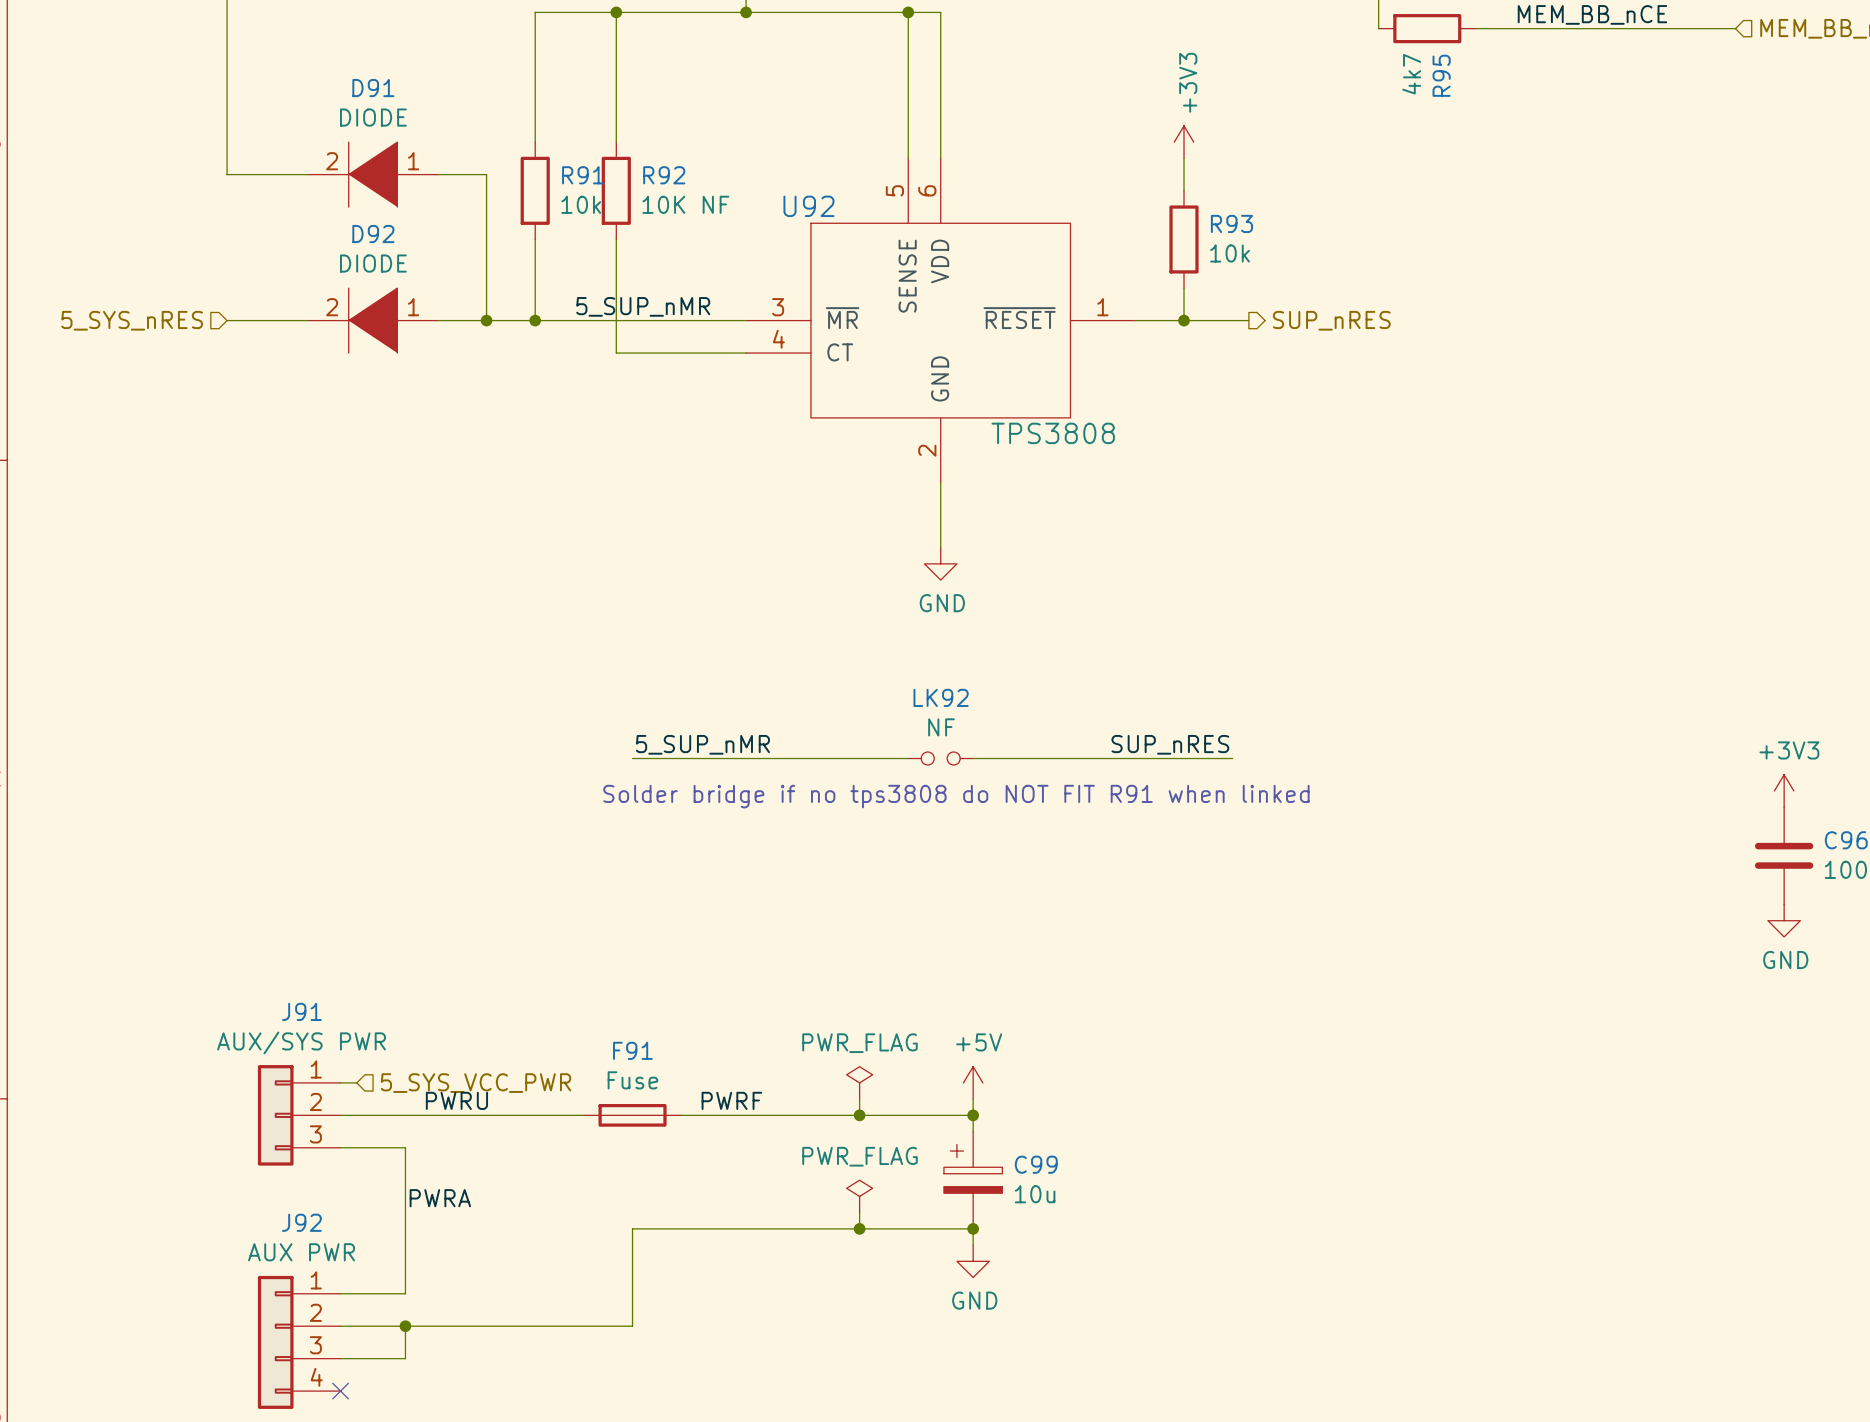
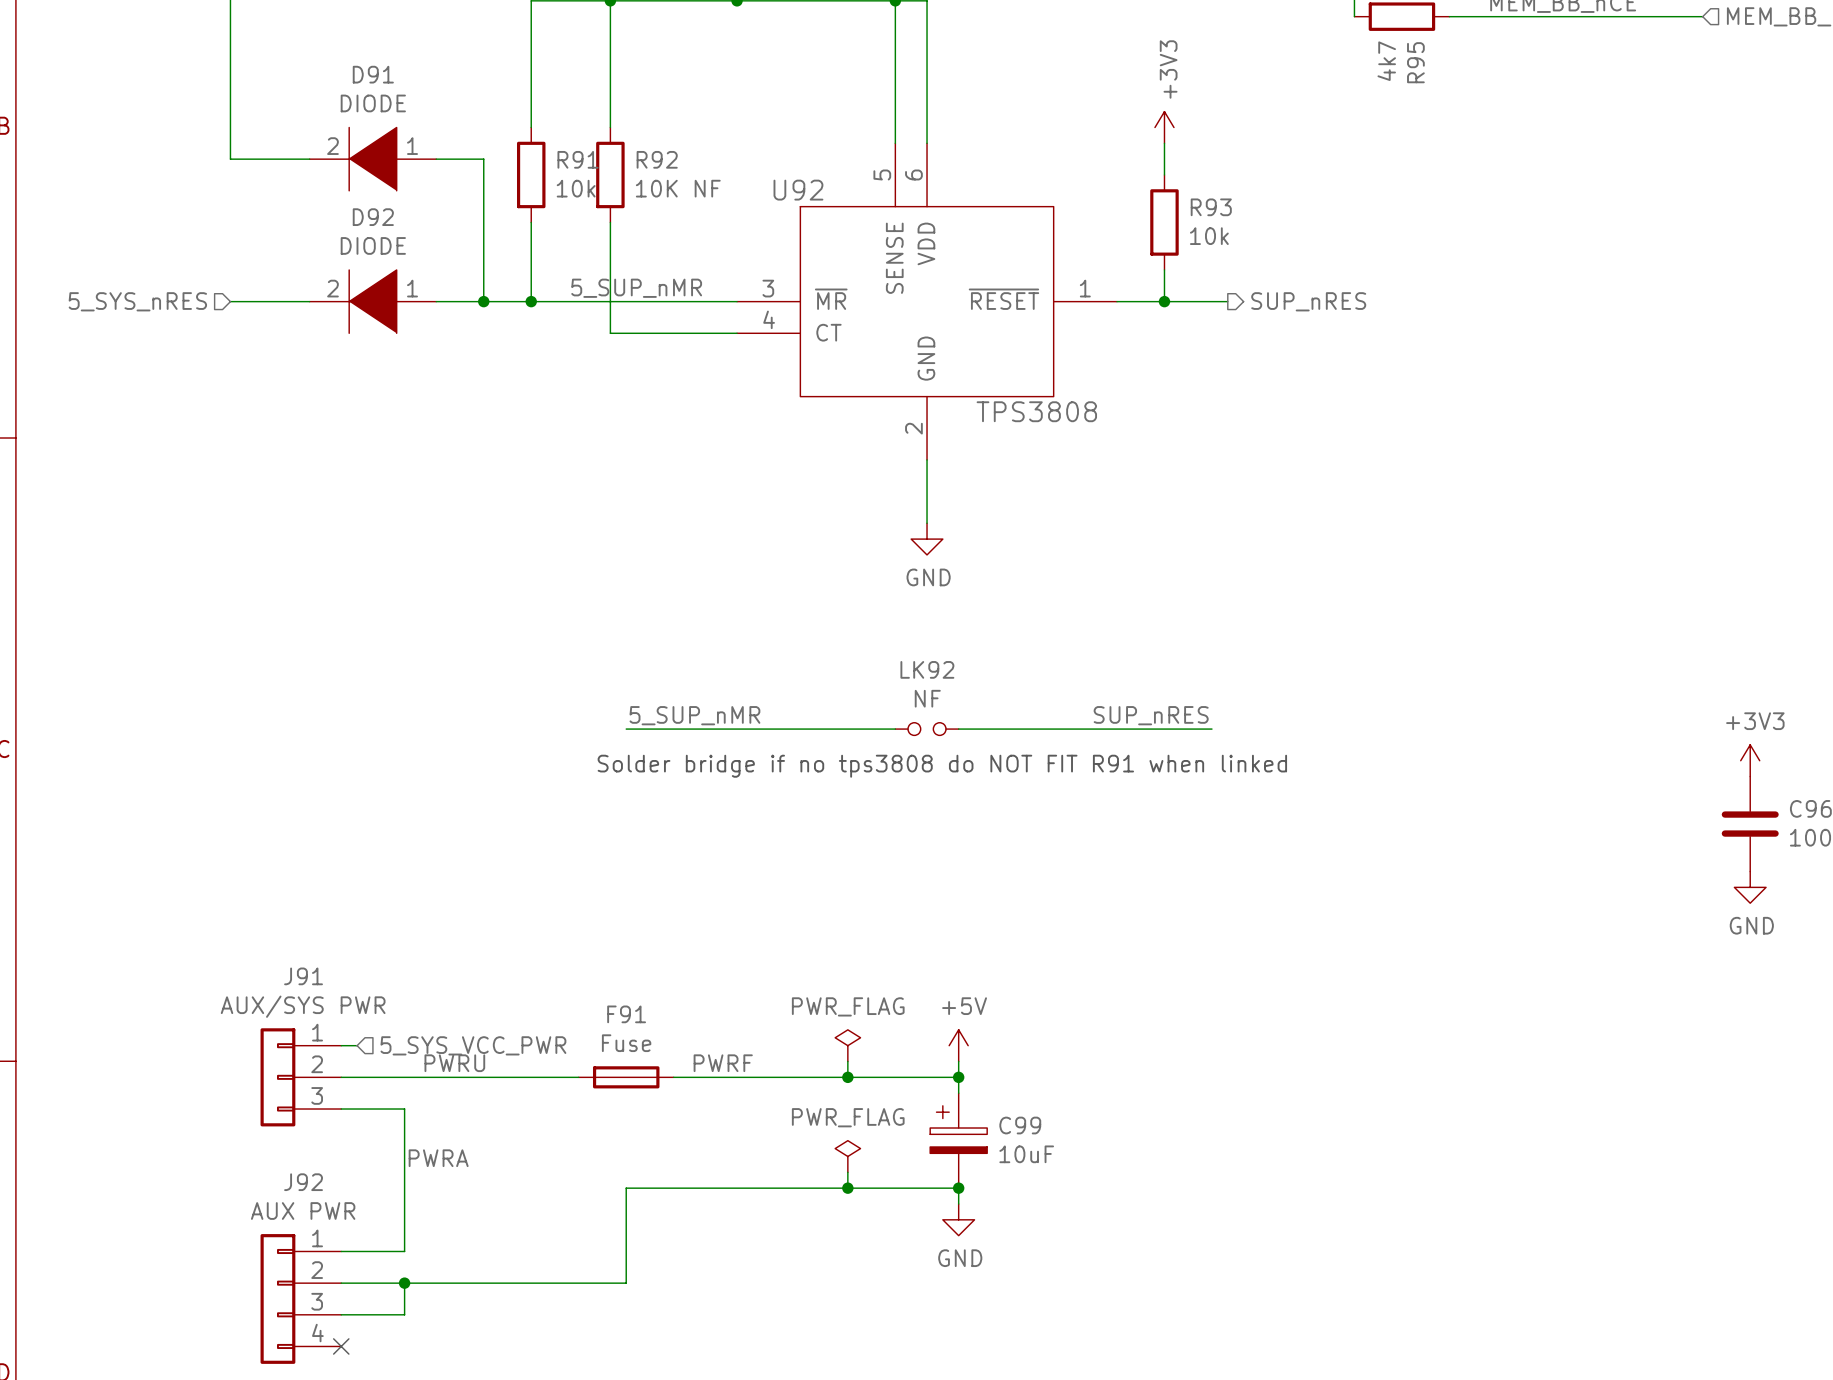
C99 value: 10u (1035, 1194) -> 10uF (1026, 1154)

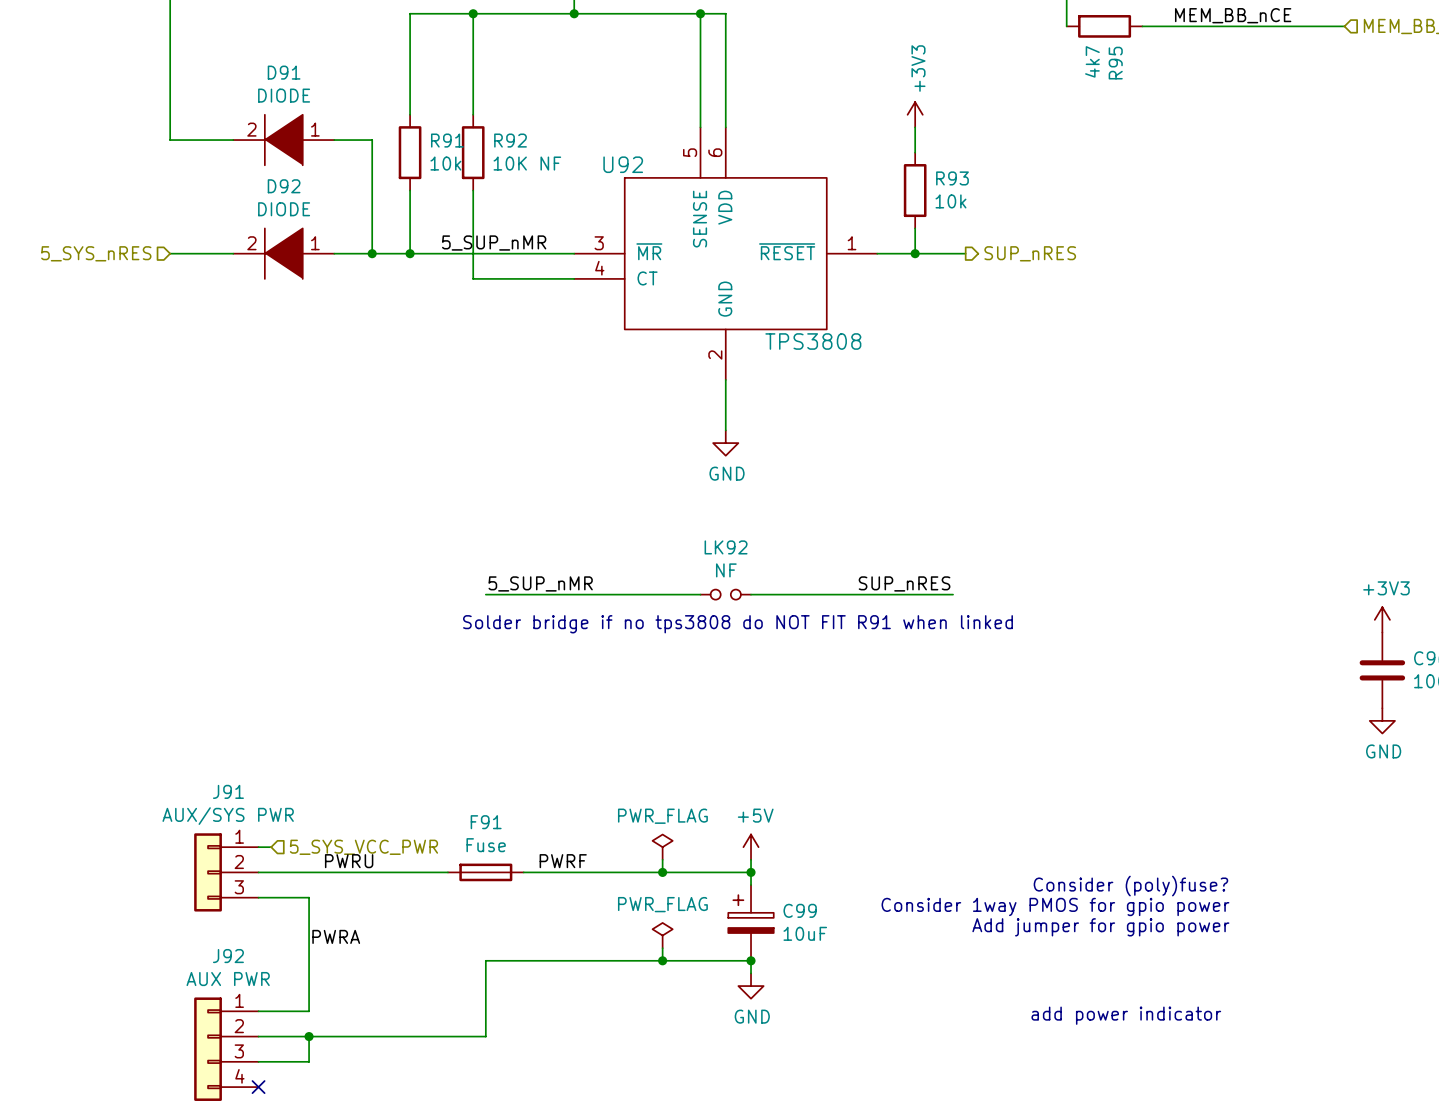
text: none -> Consider (poly)fuse? (1130, 886)
text: none -> Consider 1way PMOS for gpio power (1055, 906)
text: none -> Add jumper for gpio power (1100, 927)
text: none -> add power indicator (1126, 1015)

